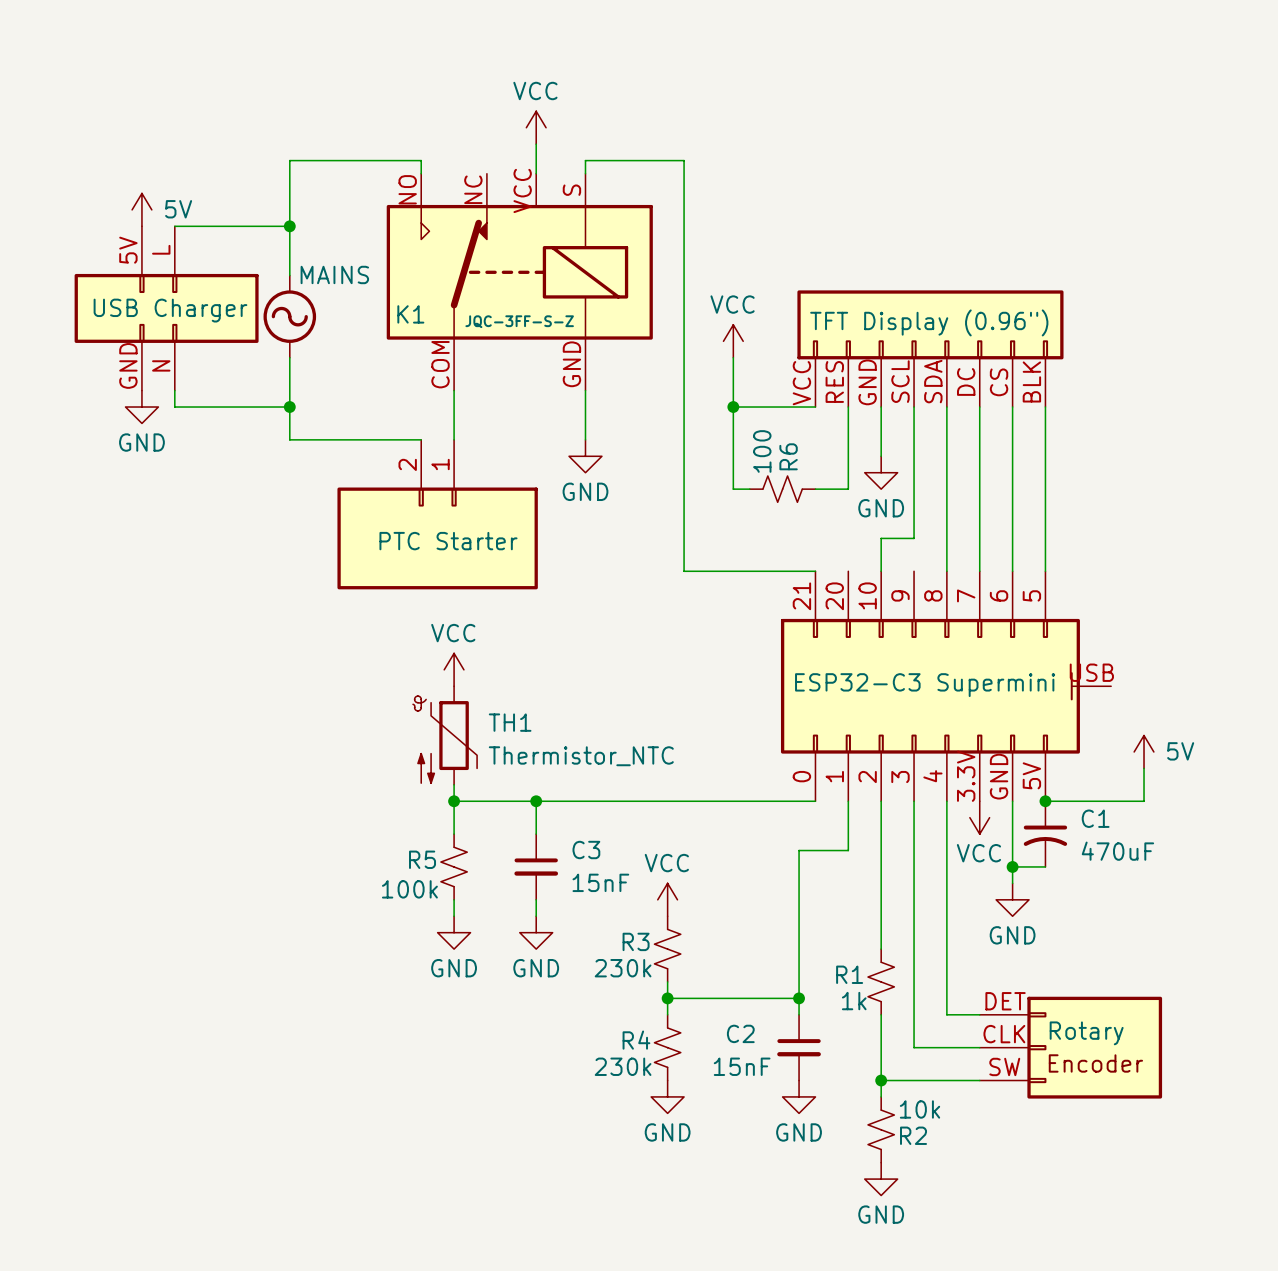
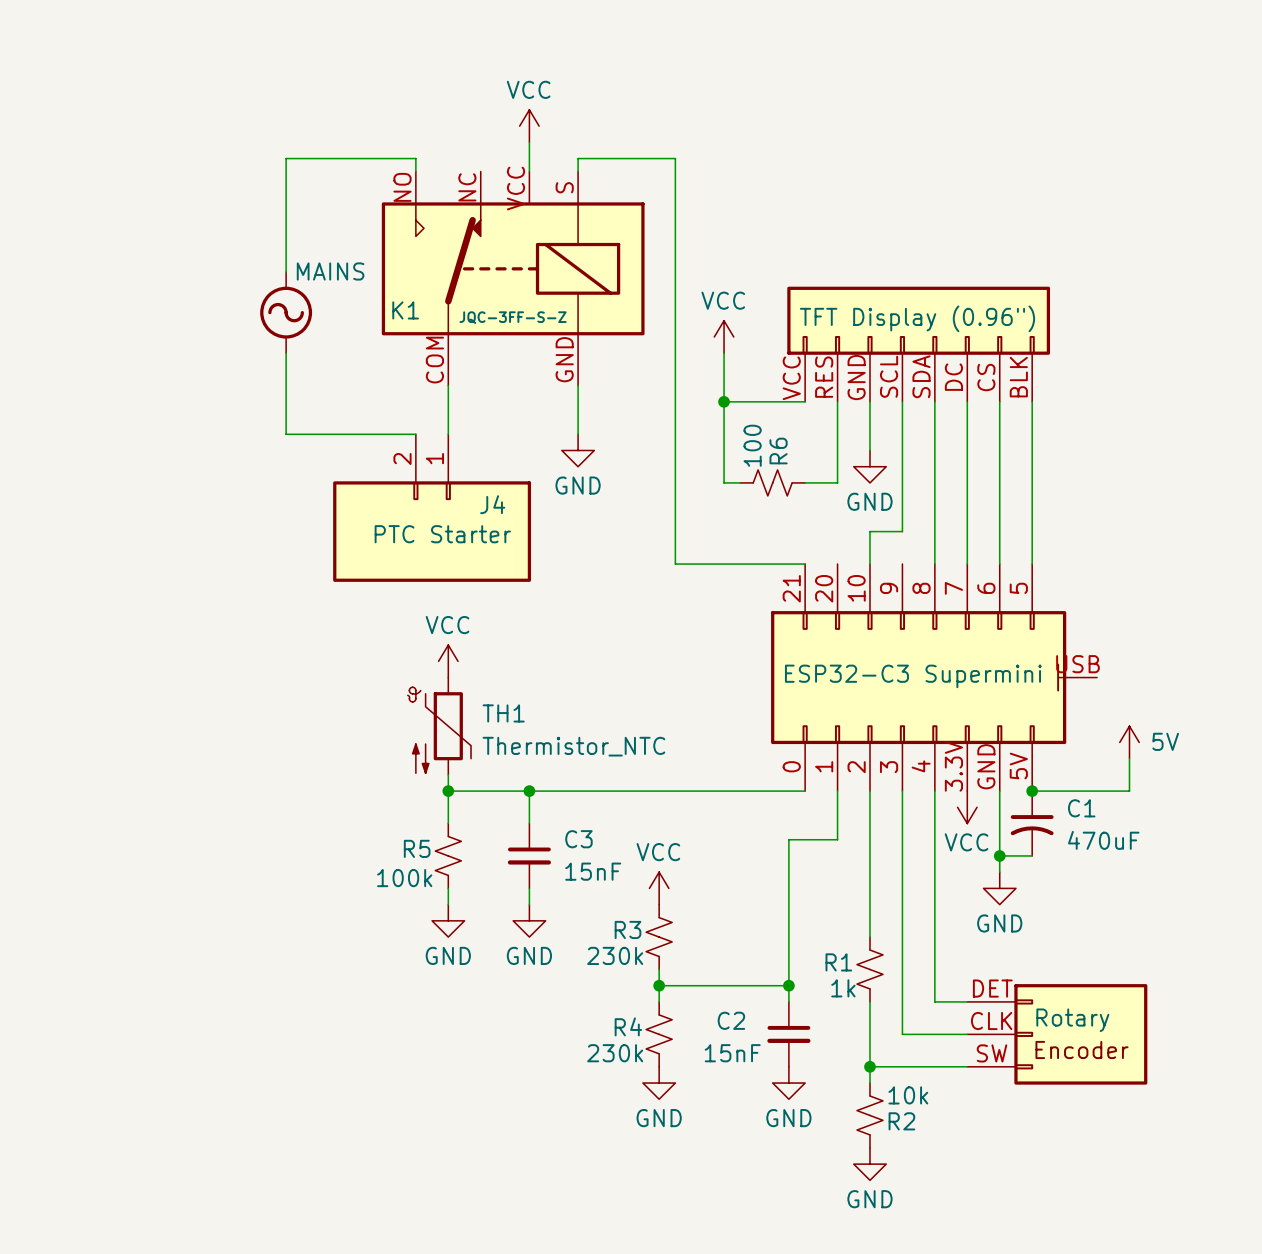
power symbol: 5V (141, 209) -> none
wire: (174, 226) (289, 226) -> none
junction: (289, 226) -> none
part: USB Charger (166, 308) -> none
wire: (174, 390) (174, 407) (289, 407) -> none
power symbol: GND (141, 407) -> none
junction: (289, 407) -> none
J4 name: none -> J4 (492, 504)

